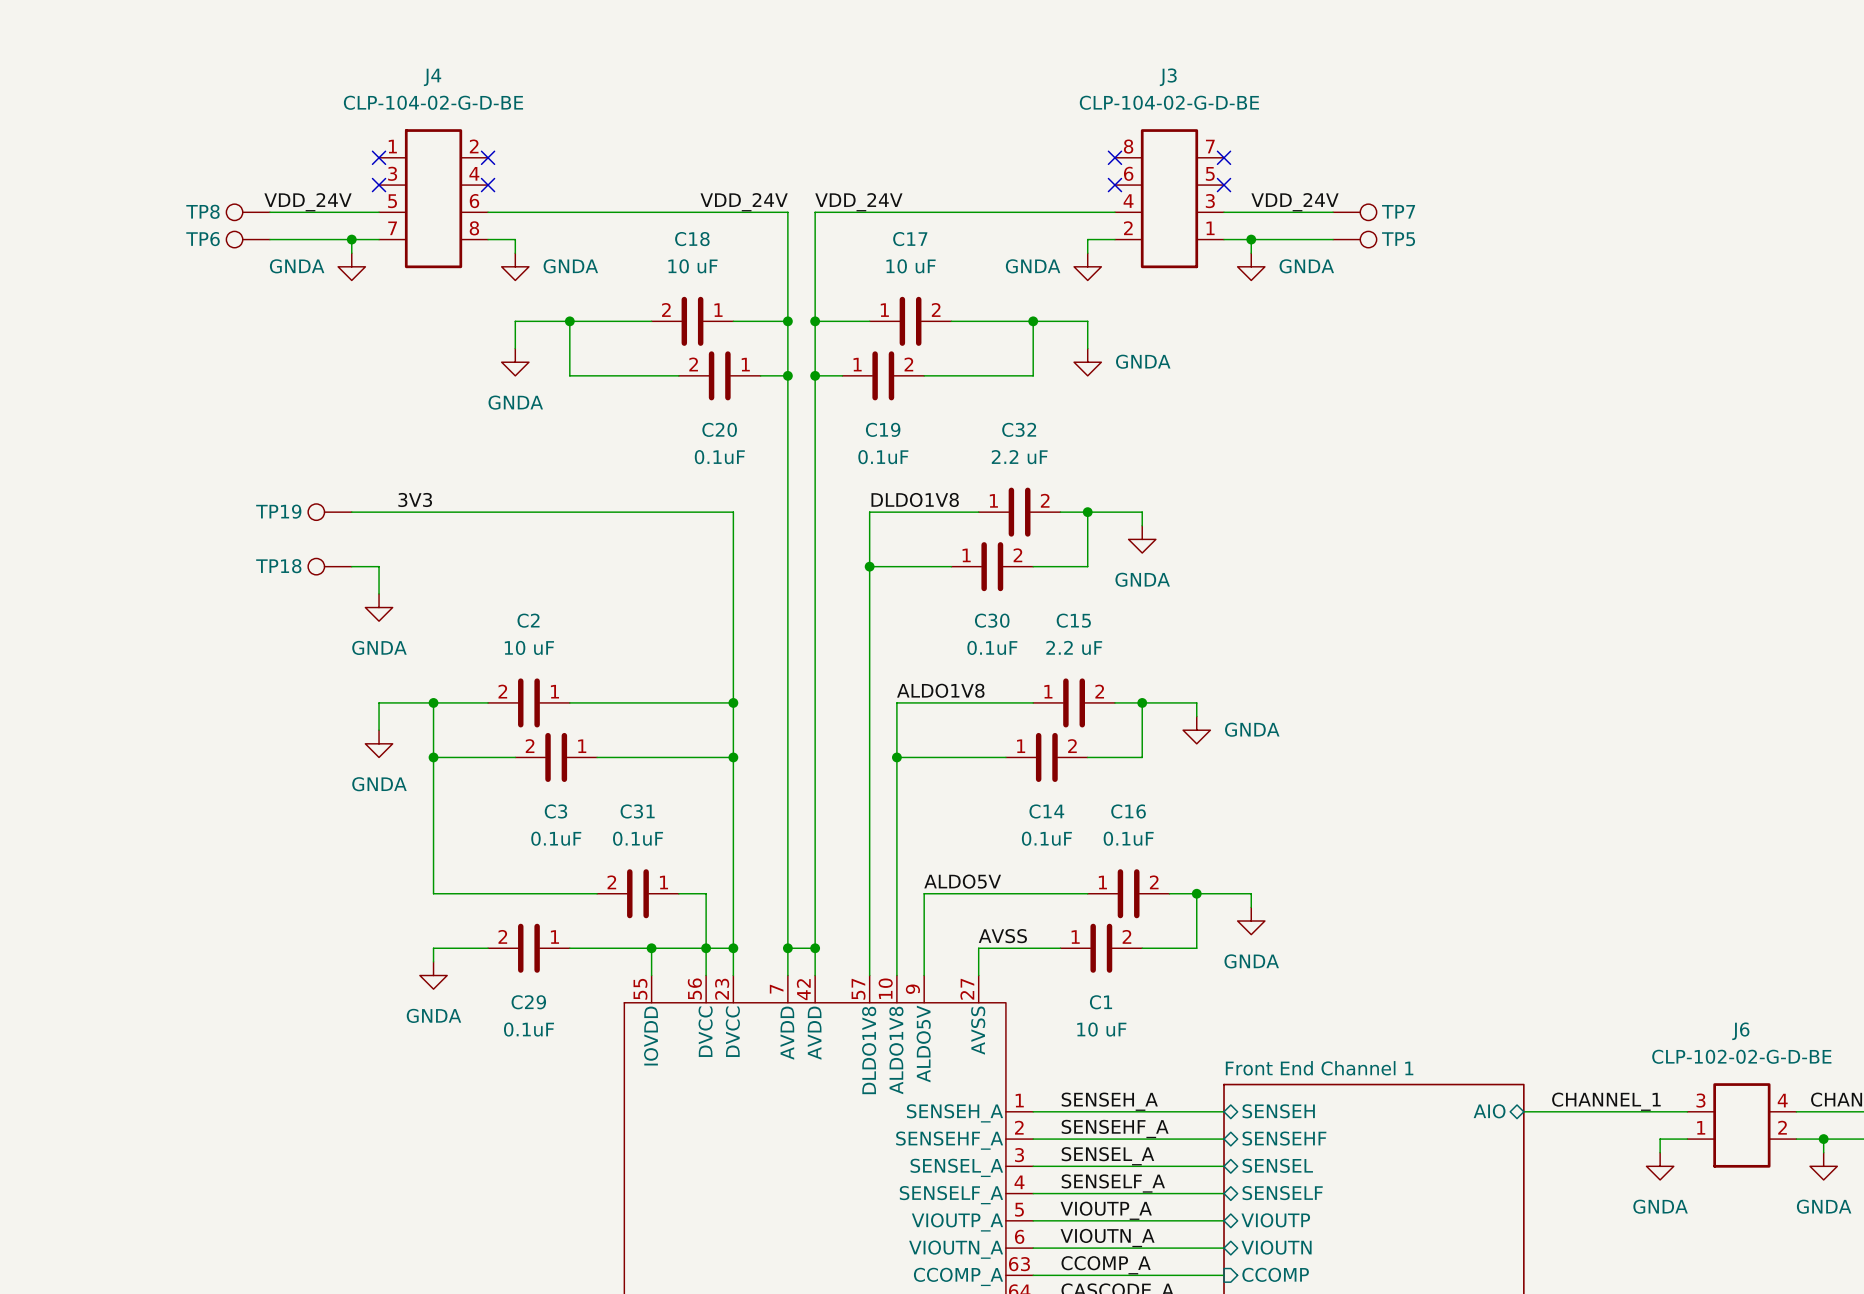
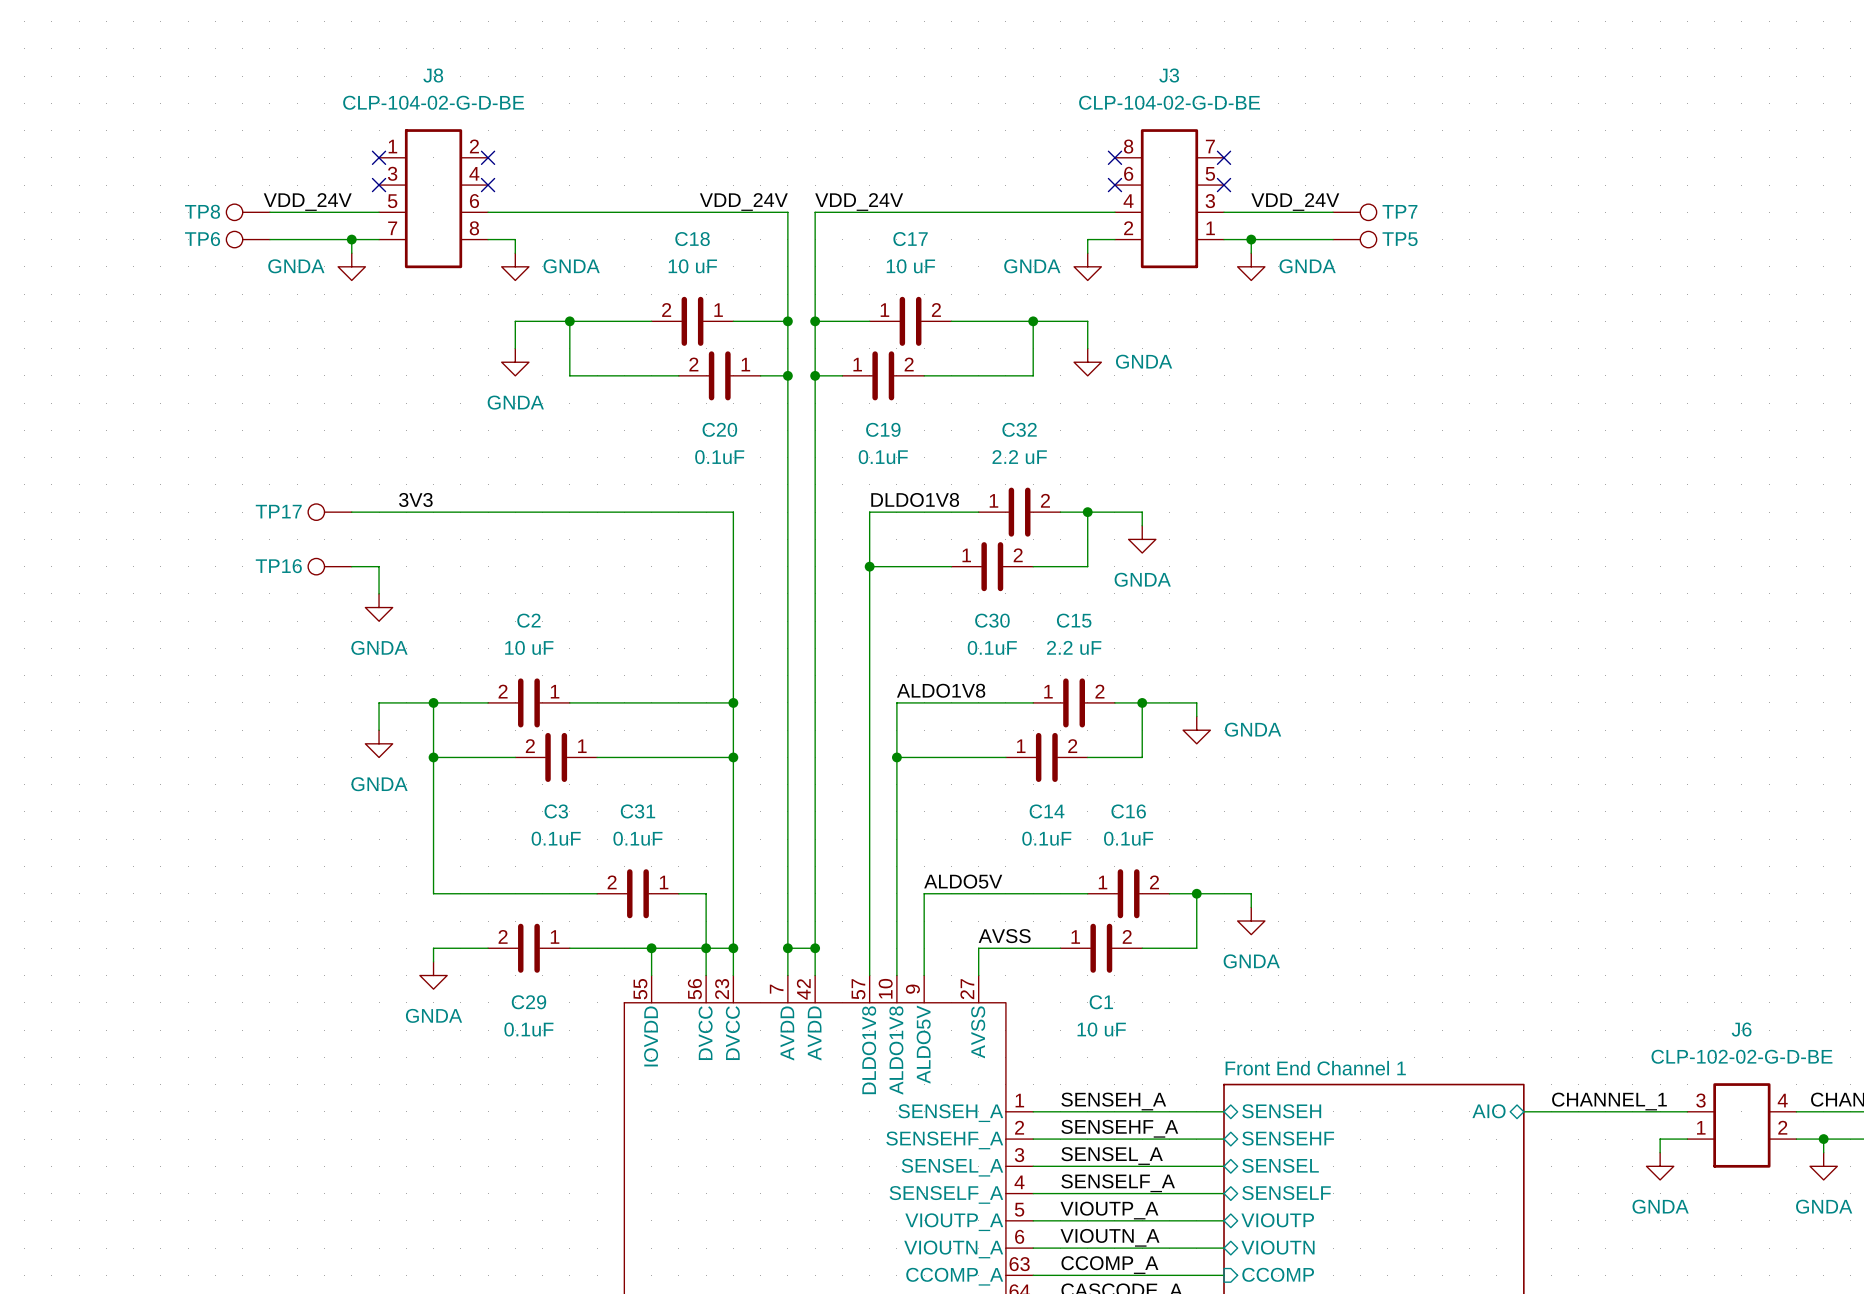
J4 name: J4 (432, 77) -> J8 (433, 75)
TP19 name: TP19 (278, 511) -> TP17 (278, 511)
TP18 name: TP18 (278, 566) -> TP16 (278, 566)

